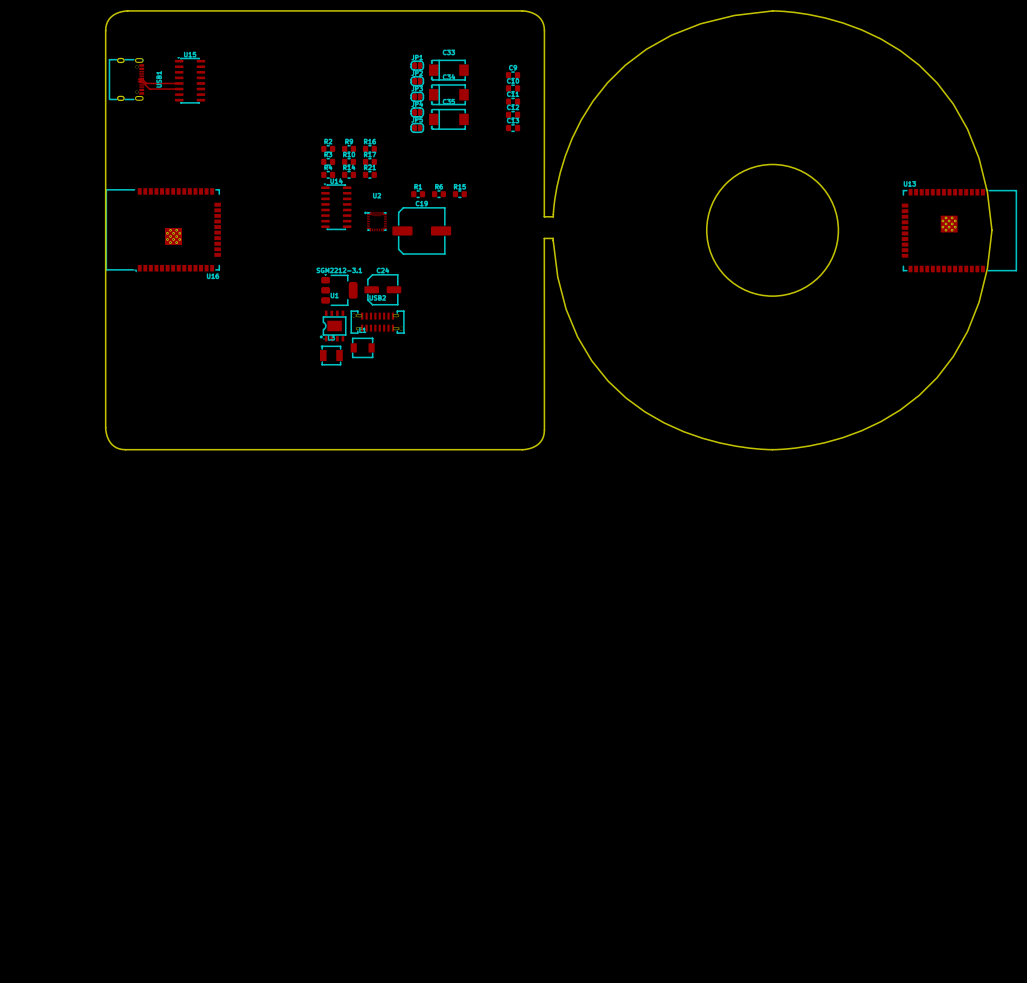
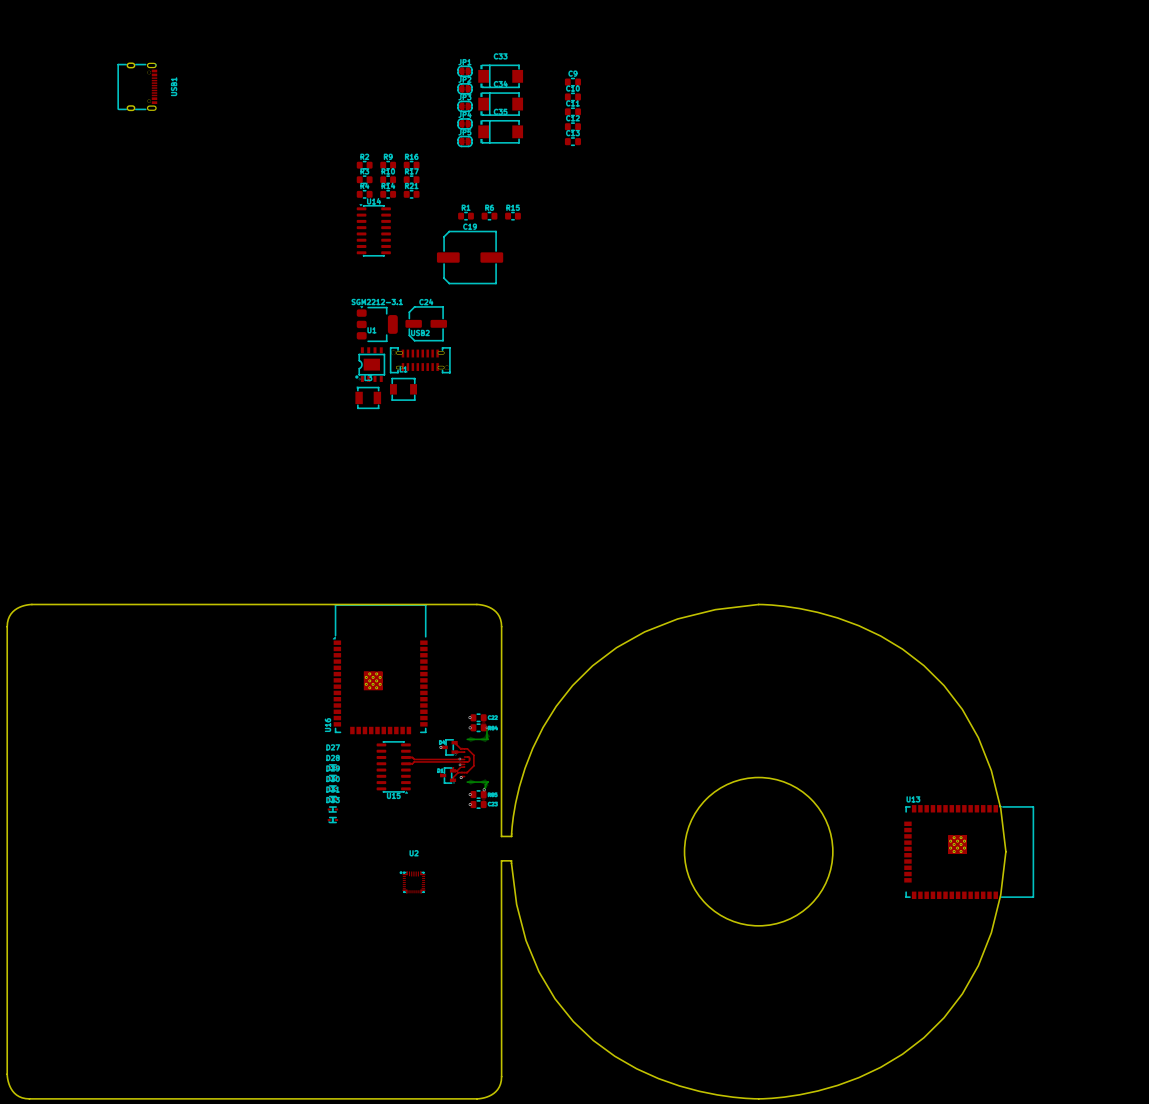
board edge: (127, 10) (522, 10) (533, 13) (541, 19) (544, 30) (544, 216) (553, 216) (560, 172) (572, 138) (581, 120) (607, 82) (625, 65) (646, 49) (671, 35) (700, 23) (734, 15) (784, 11) (809, 14) (842, 22) (880, 38) (919, 65) (937, 82) (953, 104) (967, 129) (979, 158) (987, 191) (991, 230) (987, 268) (979, 302) (967, 331) (953, 356) (937, 377) (919, 395) (880, 421) (842, 437) (809, 446) (772, 449) (736, 446) (702, 438) (664, 422) (625, 397) (608, 381) (591, 360) (577, 336) (566, 309) (557, 277) (553, 238) (544, 238) (544, 429) (541, 441) (533, 447) (522, 449) (118, 448) (109, 440) (105, 428) (105, 30) (110, 17) (118, 12) (127, 10) -> none
top track: (138, 79) (142, 79) (146, 83) (179, 83) -> none
part rotation: 0° (190, 80) -> 180° (393, 767)
part position: (190, 80) -> (393, 767)
top track: (138, 81) (142, 81) (149, 89) (179, 89) -> none
round board edge: [706, 164, 839, 297] -> none
part position: (375, 221) -> (412, 882)
part rotation: 0° (163, 230) -> 90° clockwise (380, 669)
part position: (163, 230) -> (380, 669)
part position: (959, 230) -> (968, 851)
board edge: none -> (31, 604) (476, 604) (489, 607) (497, 613) (501, 626) (501, 836) (511, 836) (519, 786) (532, 748) (543, 727) (572, 685) (592, 665) (616, 647) (644, 631) (677, 619) (715, 609) (758, 604) (771, 605) (799, 608) (837, 617) (880, 636) (923, 665) (944, 685) (962, 709) (978, 737) (991, 770) (1000, 808) (1005, 851) (1000, 894) (991, 932) (978, 965) (962, 993) (944, 1017) (923, 1037) (880, 1067) (837, 1085) (799, 1094) (758, 1098) (717, 1094) (679, 1086) (636, 1068) (593, 1040) (573, 1021) (554, 998) (539, 971) (526, 940) (516, 904) (511, 860) (501, 860) (501, 1076) (497, 1089) (489, 1096) (476, 1098) (22, 1097) (11, 1088) (7, 1074) (7, 626) (8, 619) (12, 611) (21, 606) (31, 604)
via: none -> (469, 717)
part: none -> (478, 717)
via: none -> (470, 727)
part: none -> (478, 727)
bottom track: none -> (486, 727) (488, 739) (467, 739)
via: none -> (486, 727)
top track: none -> (454, 742) (460, 748) (467, 748) (473, 755) (473, 765) (467, 772) (458, 772) (453, 780)
via: none -> (440, 747)
part: none -> (449, 747)
top track: none -> (454, 752) (464, 752)
top track: none -> (405, 757) (414, 759) (464, 759)
top track: none -> (464, 757) (469, 757) (468, 761) (405, 763)
via: none -> (459, 758)
top track: none -> (464, 764) (459, 764)
via: none -> (459, 764)
top track: none -> (464, 766) (461, 767)
part: none -> (332, 767)
top track: none -> (460, 767) (457, 770) (453, 770) (453, 767)
part: none -> (448, 775)
top track: none -> (464, 776) (461, 777)
part: none -> (332, 777)
via: none -> (461, 777)
round board edge: none -> [684, 777, 833, 926]
bottom track: none -> (467, 782) (488, 782) (484, 789)
part: none -> (332, 788)
via: none -> (484, 789)
via: none -> (470, 794)
part: none -> (478, 794)
part: none -> (332, 798)
via: none -> (470, 804)
part: none -> (478, 804)
part: none -> (332, 809)
part: none -> (332, 820)

